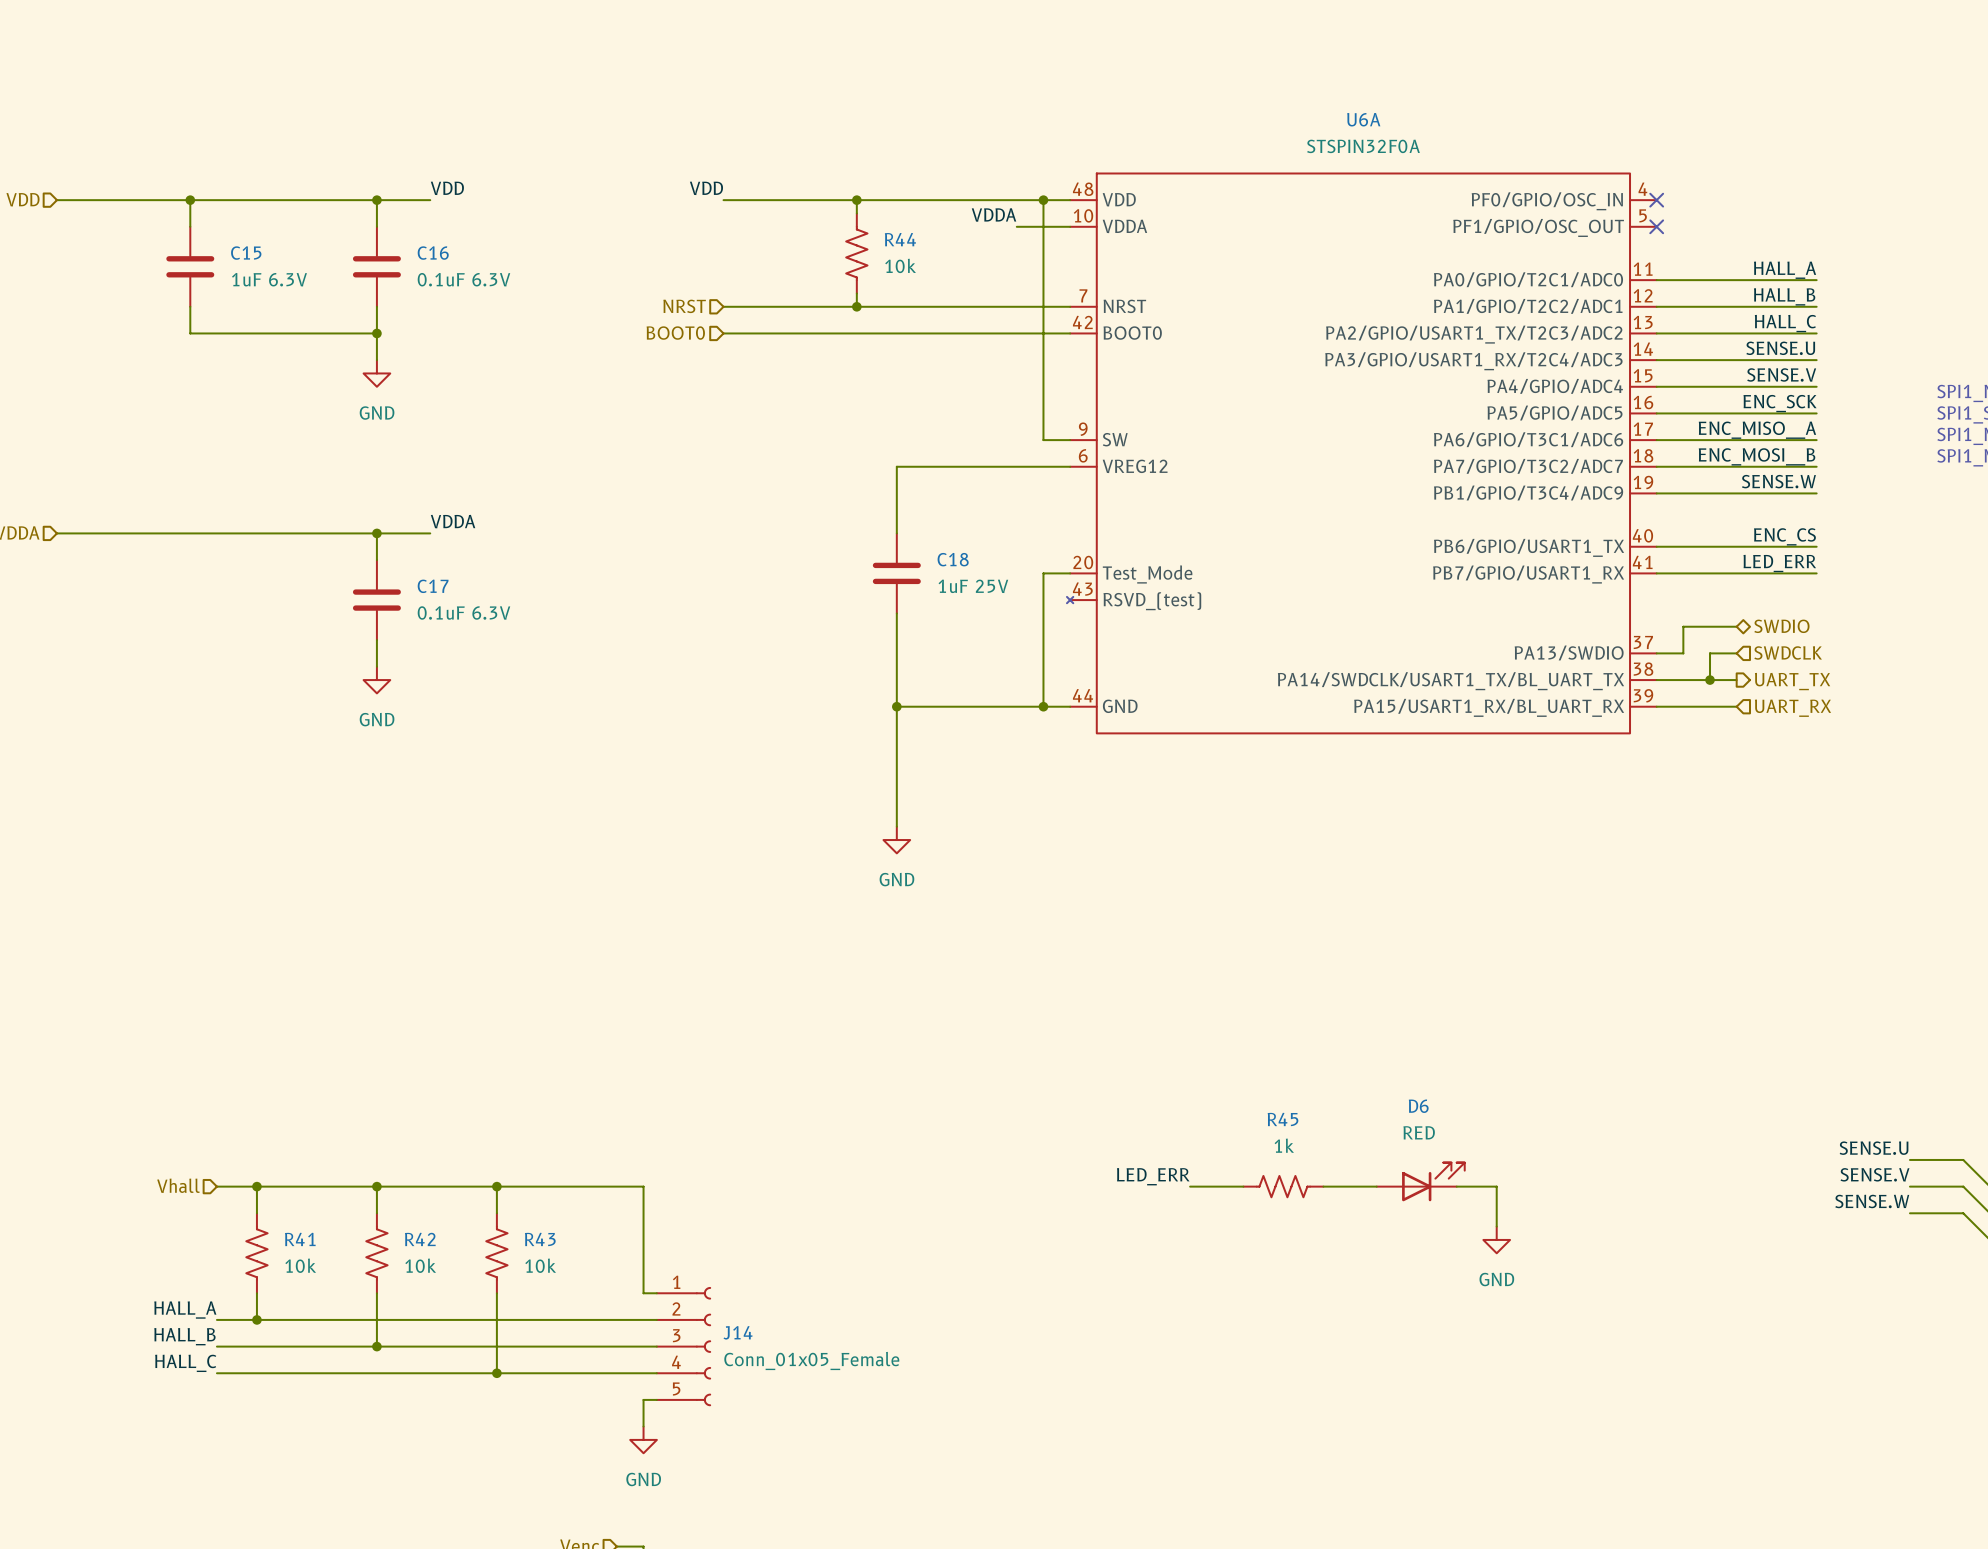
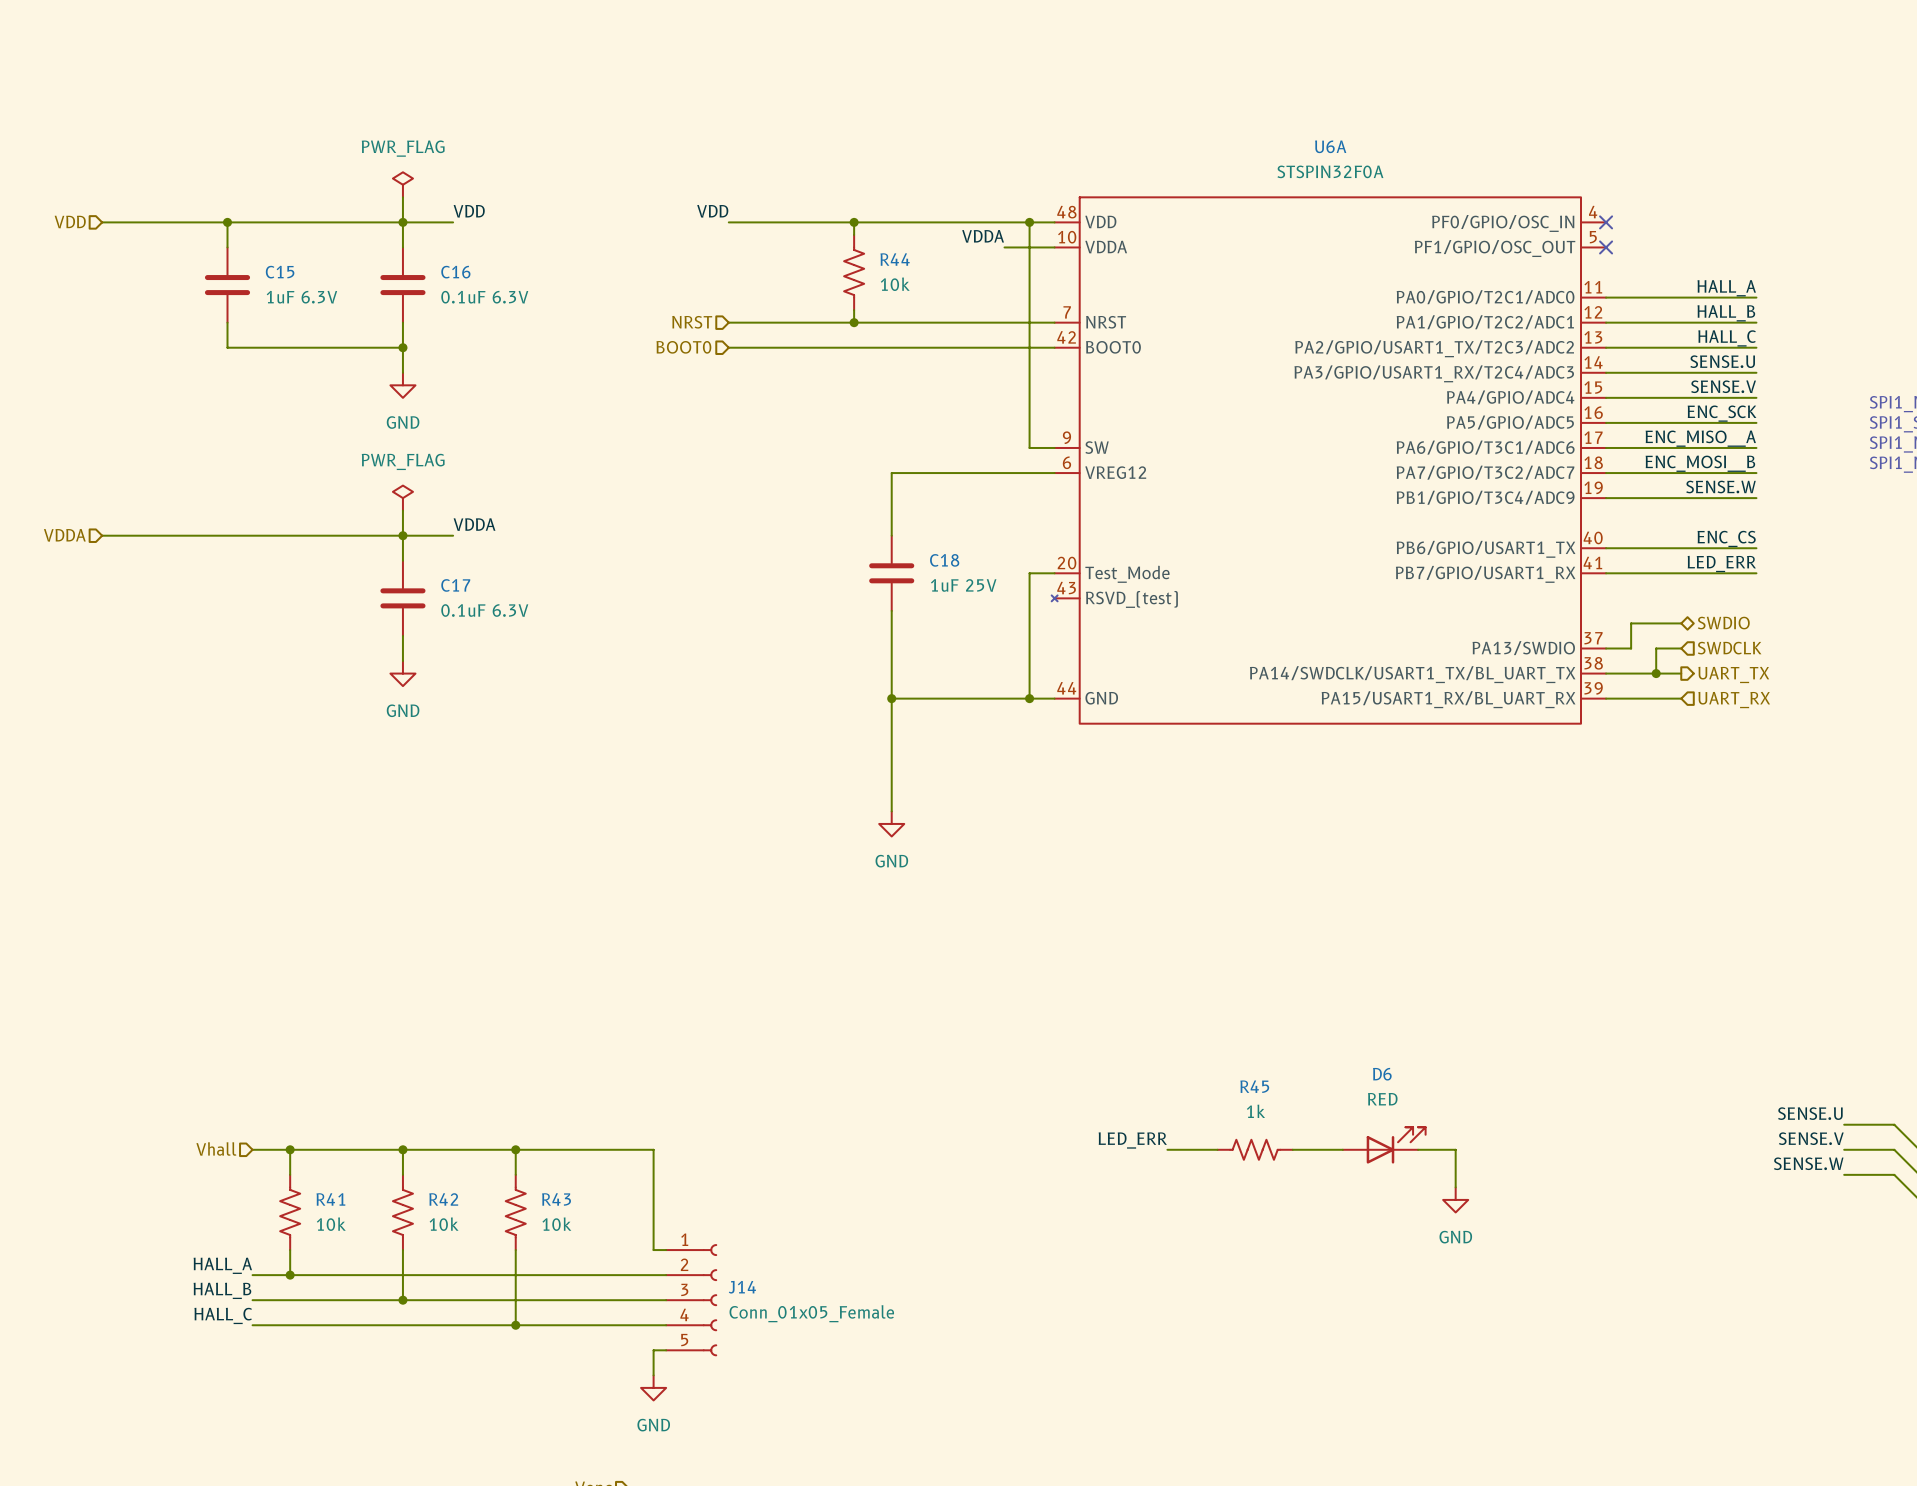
power symbol: none -> PWR_FLAG (402, 184)
wire: none -> (402, 197) (402, 222)
power symbol: none -> PWR_FLAG (402, 498)
wire: none -> (402, 510) (402, 535)

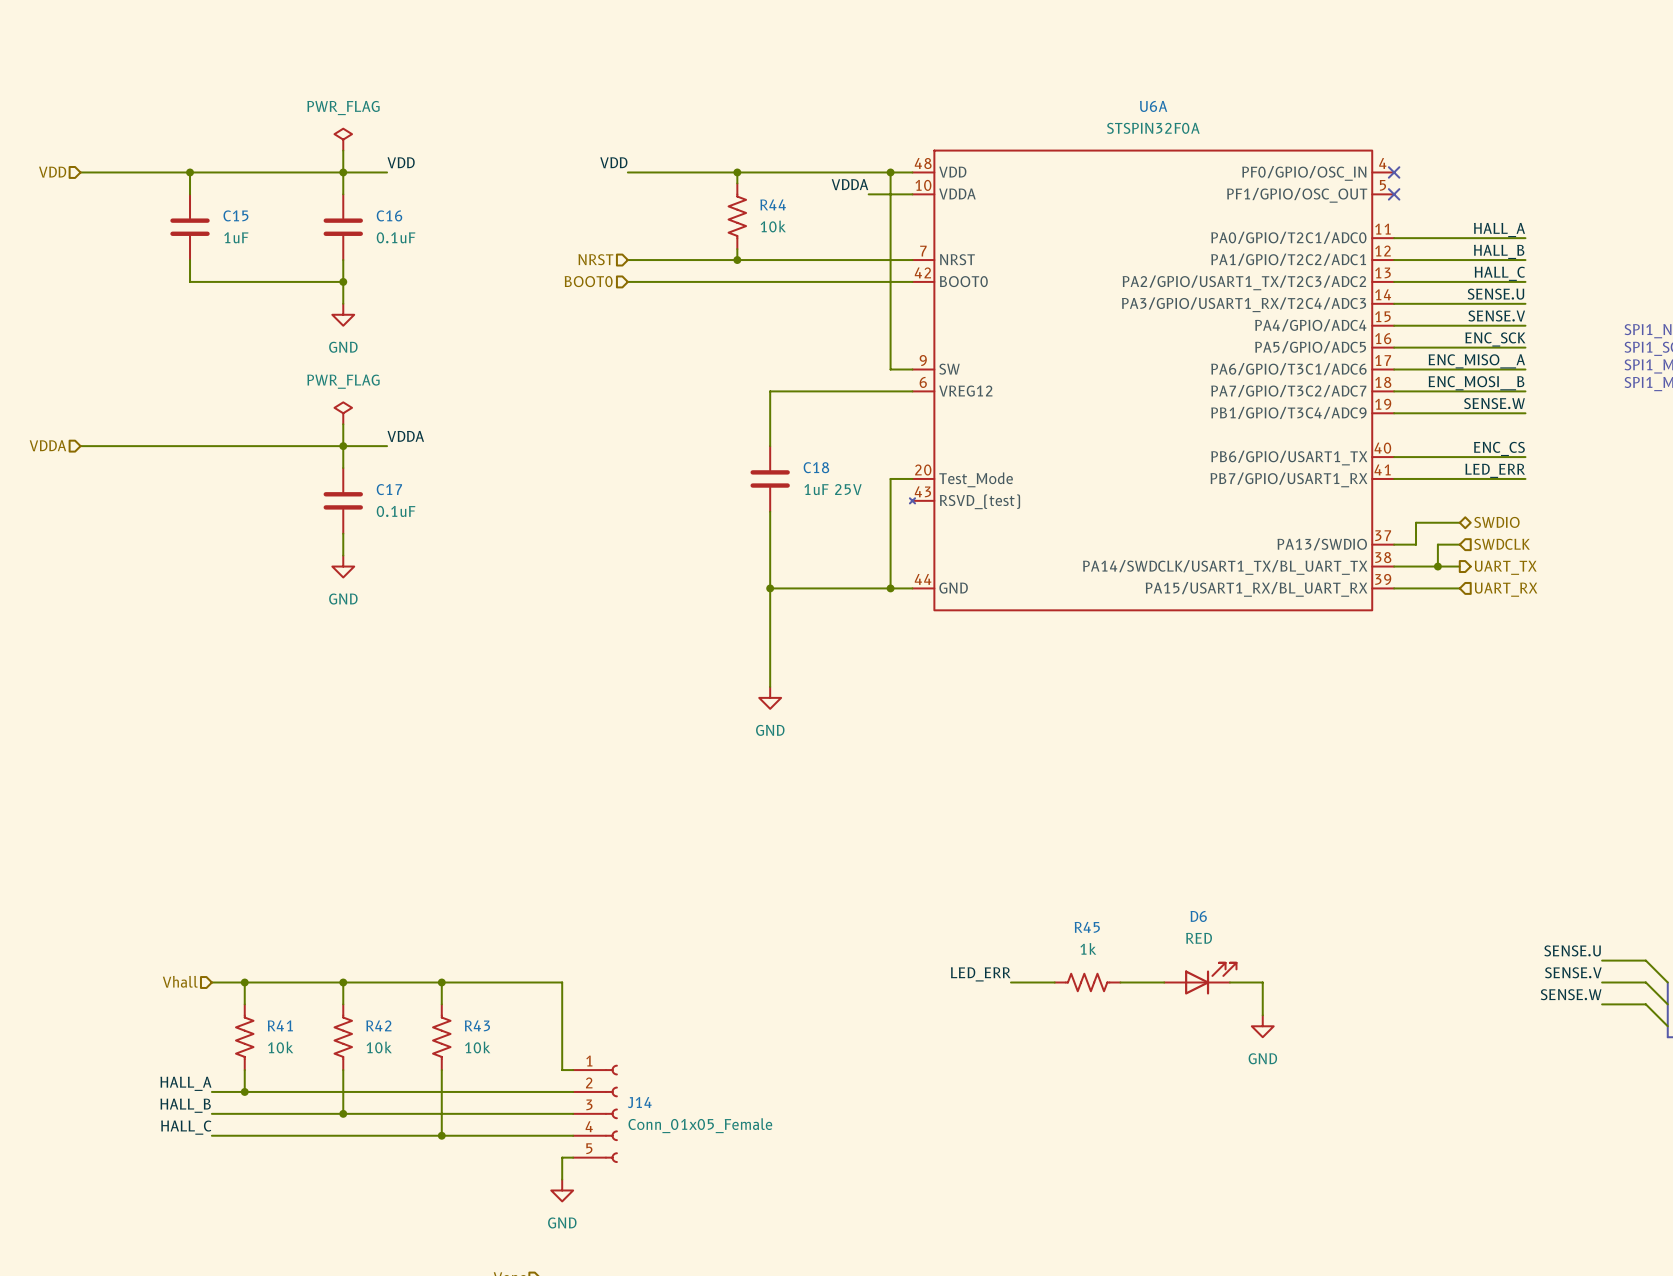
C15 value: 1uF 6.3V (301, 297) -> 1uF (236, 237)
C16 value: 0.1uF 6.3V (484, 297) -> 0.1uF (396, 237)
C17 value: 0.1uF 6.3V (484, 610) -> 0.1uF (396, 511)

